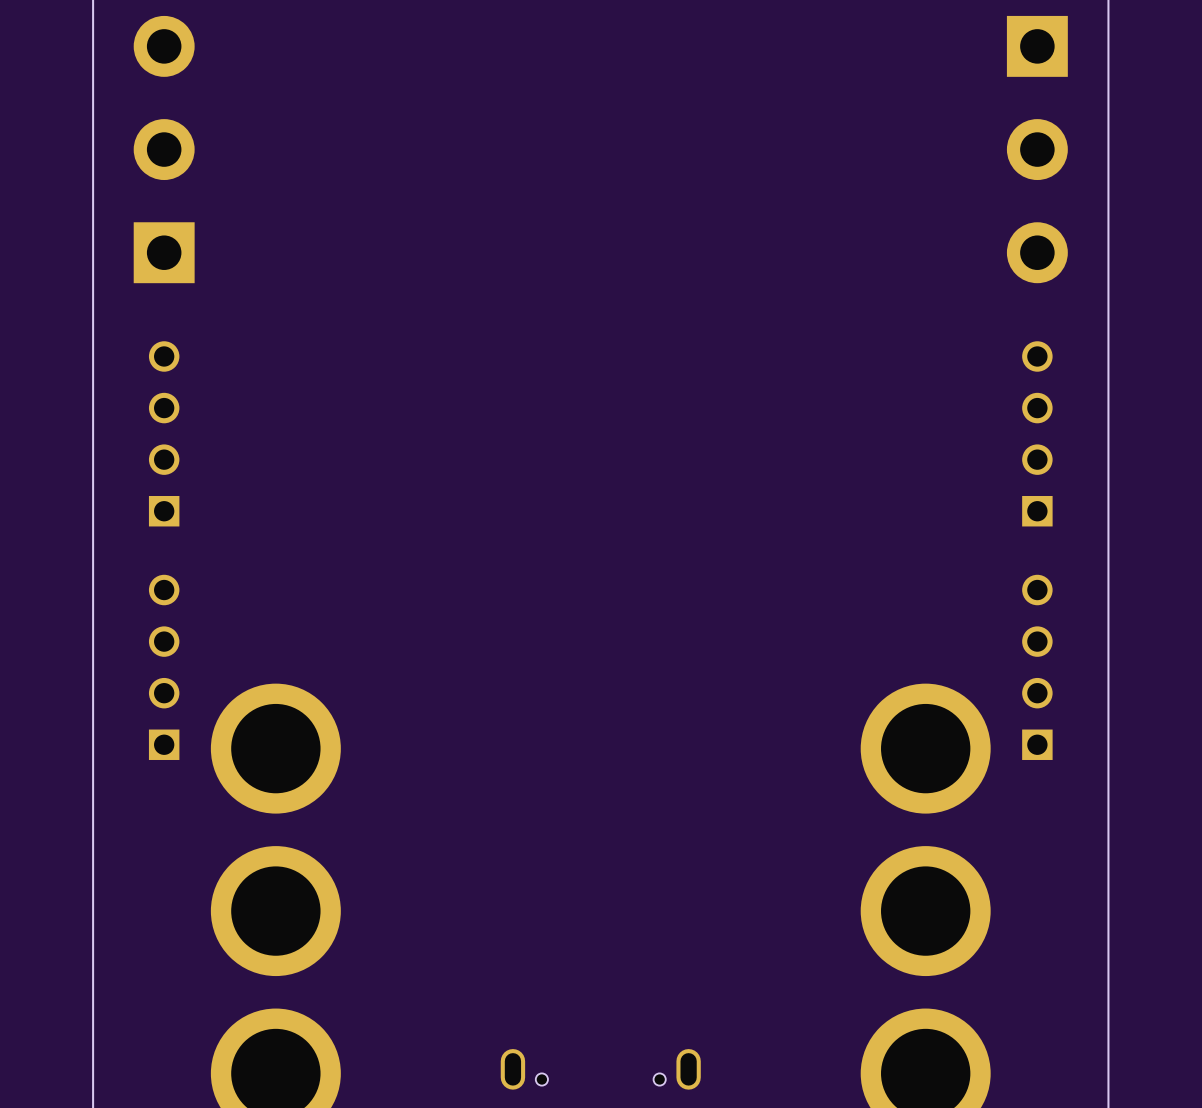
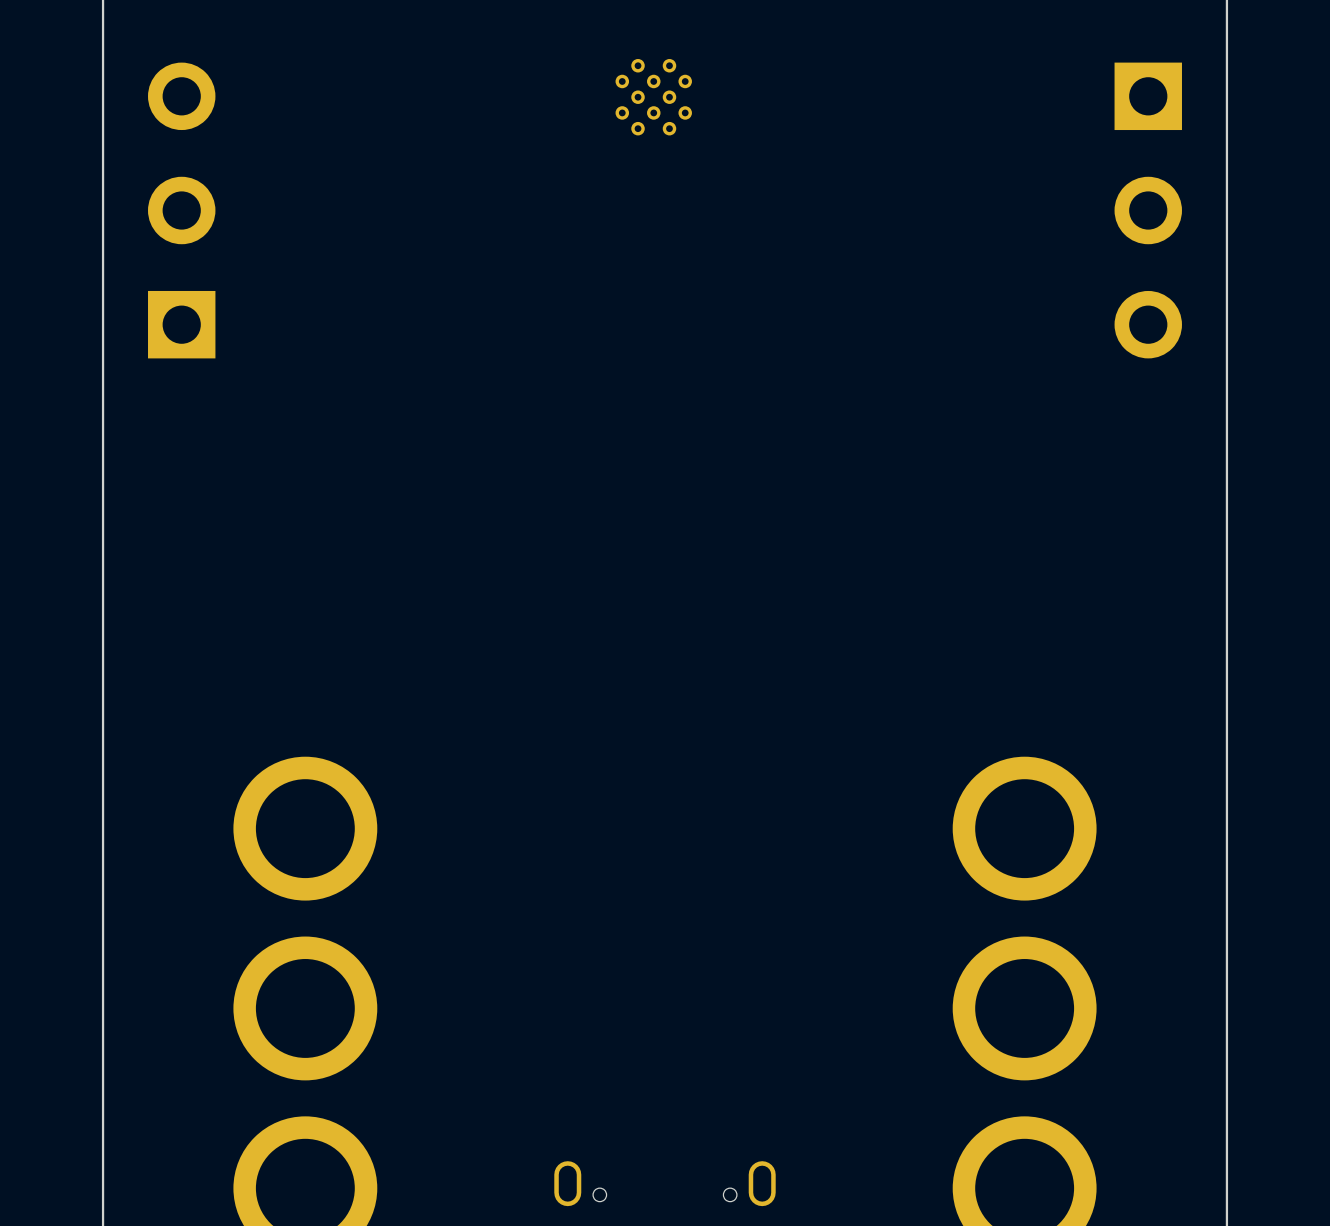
part: none -> (653, 97)
part position: (164, 149) -> (181, 210)
part position: (1037, 149) -> (1148, 210)
part: (164, 433) -> none
part: (1037, 433) -> none
part: (164, 667) -> none
part: (1037, 667) -> none

